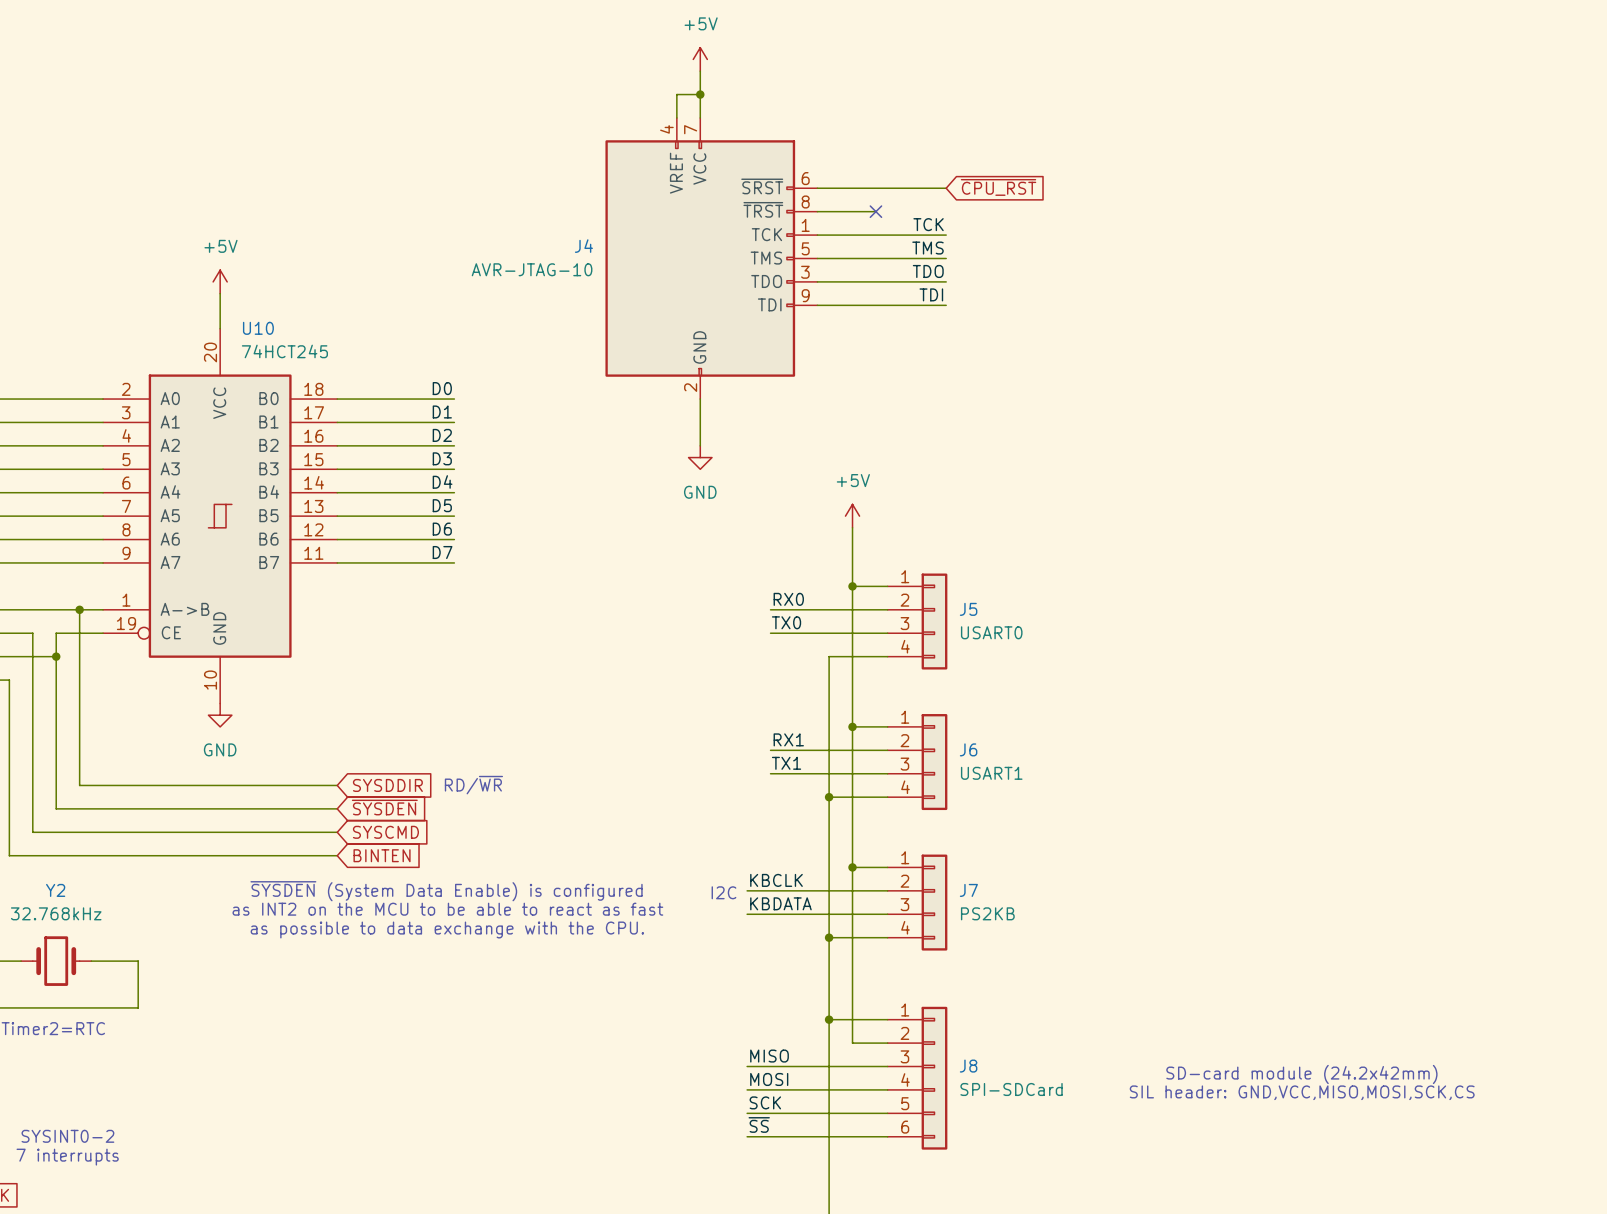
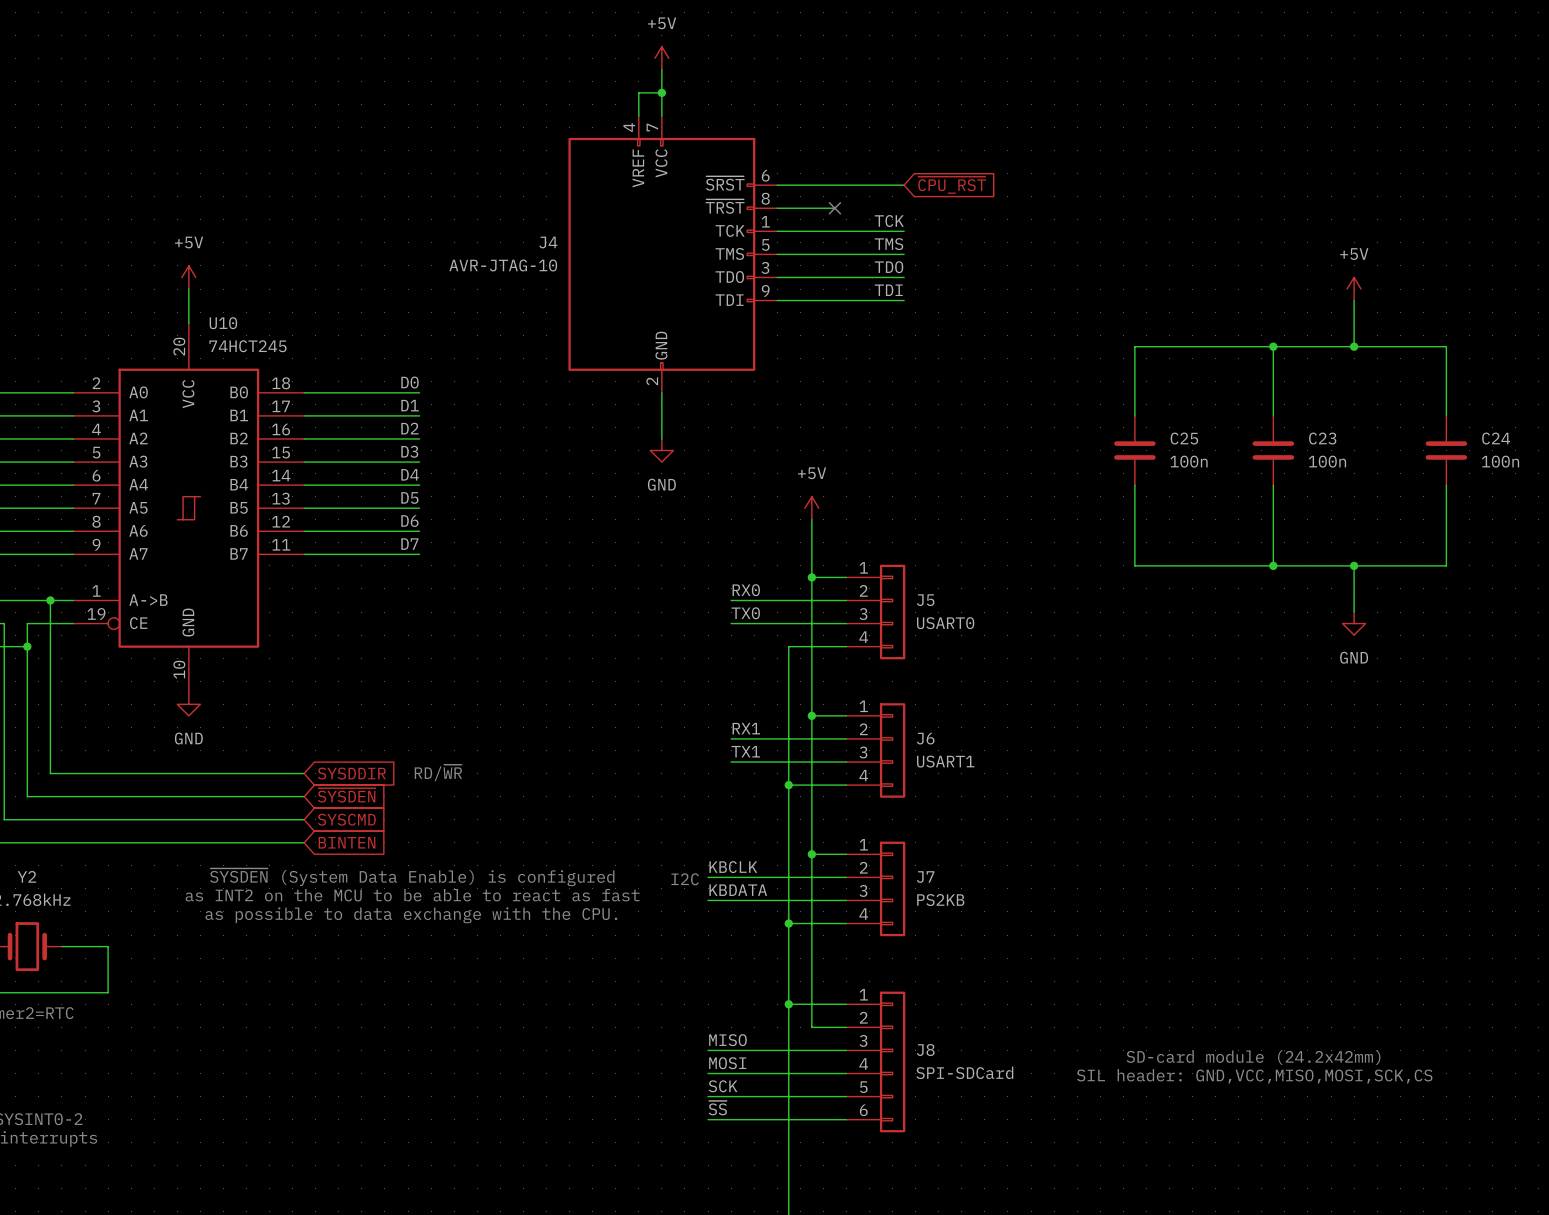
power symbol: none -> +5V (1354, 289)
wire: none -> (1354, 300) (1354, 346)
wire: none -> (1273, 346) (1273, 415)
junction: none -> (1273, 346)
junction: none -> (1354, 346)
wire: none -> (1134, 415) (1134, 346) (1446, 346) (1446, 415)
C25: none -> 100n (1134, 450)
C23: none -> 100n (1273, 450)
C24: none -> 100n (1446, 450)
wire: none -> (1134, 485) (1134, 565) (1446, 565) (1446, 485)
wire: none -> (1273, 485) (1273, 565)
junction: none -> (1273, 565)
wire: none -> (1354, 565) (1354, 612)
junction: none -> (1354, 565)
power symbol: none -> GND (1354, 623)

